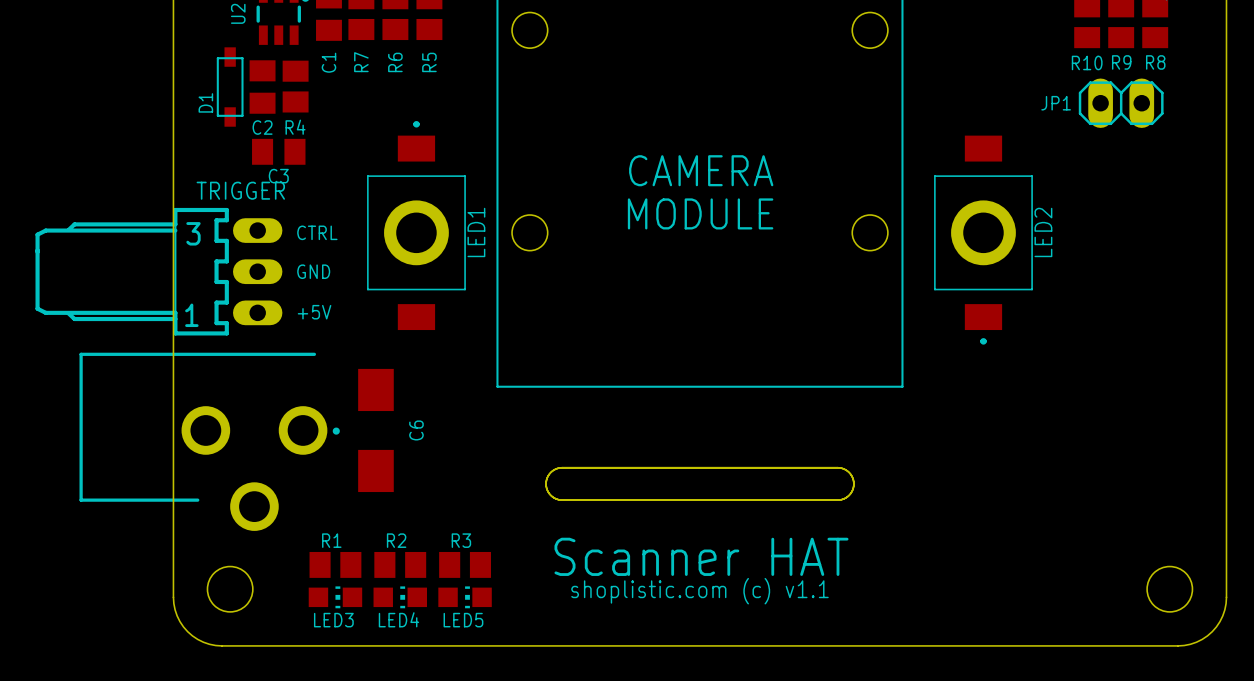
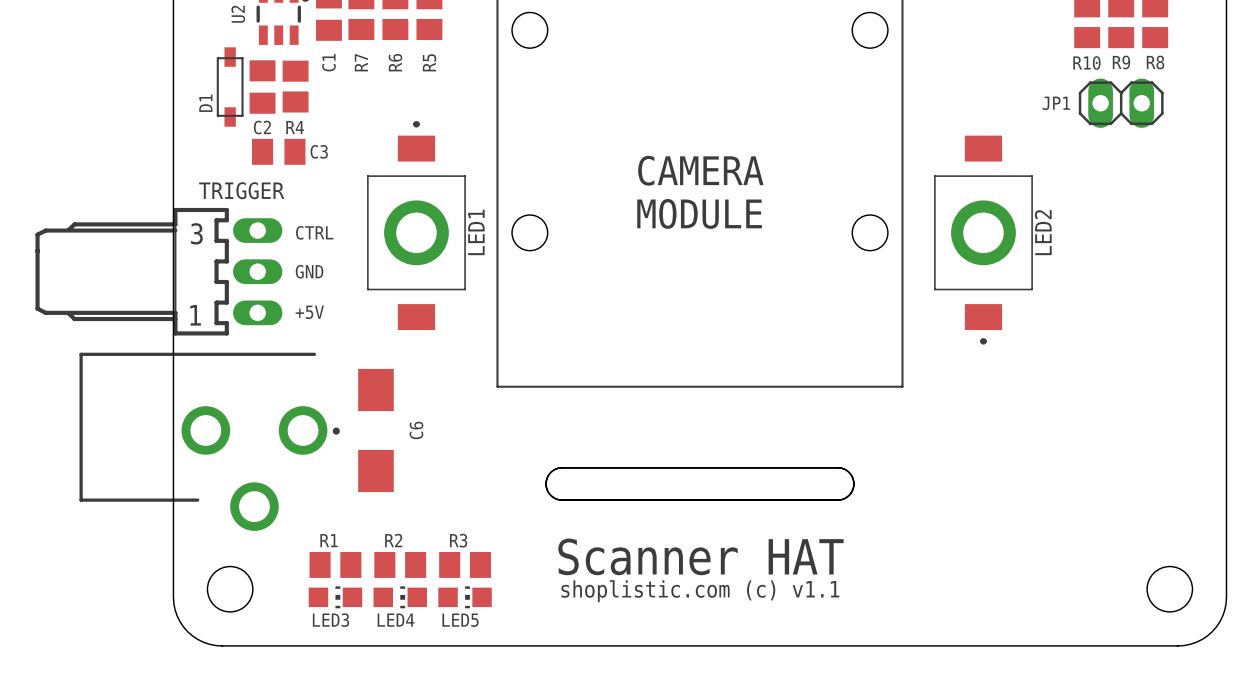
C3 name position: C3 (278, 176) -> C3 (319, 151)

